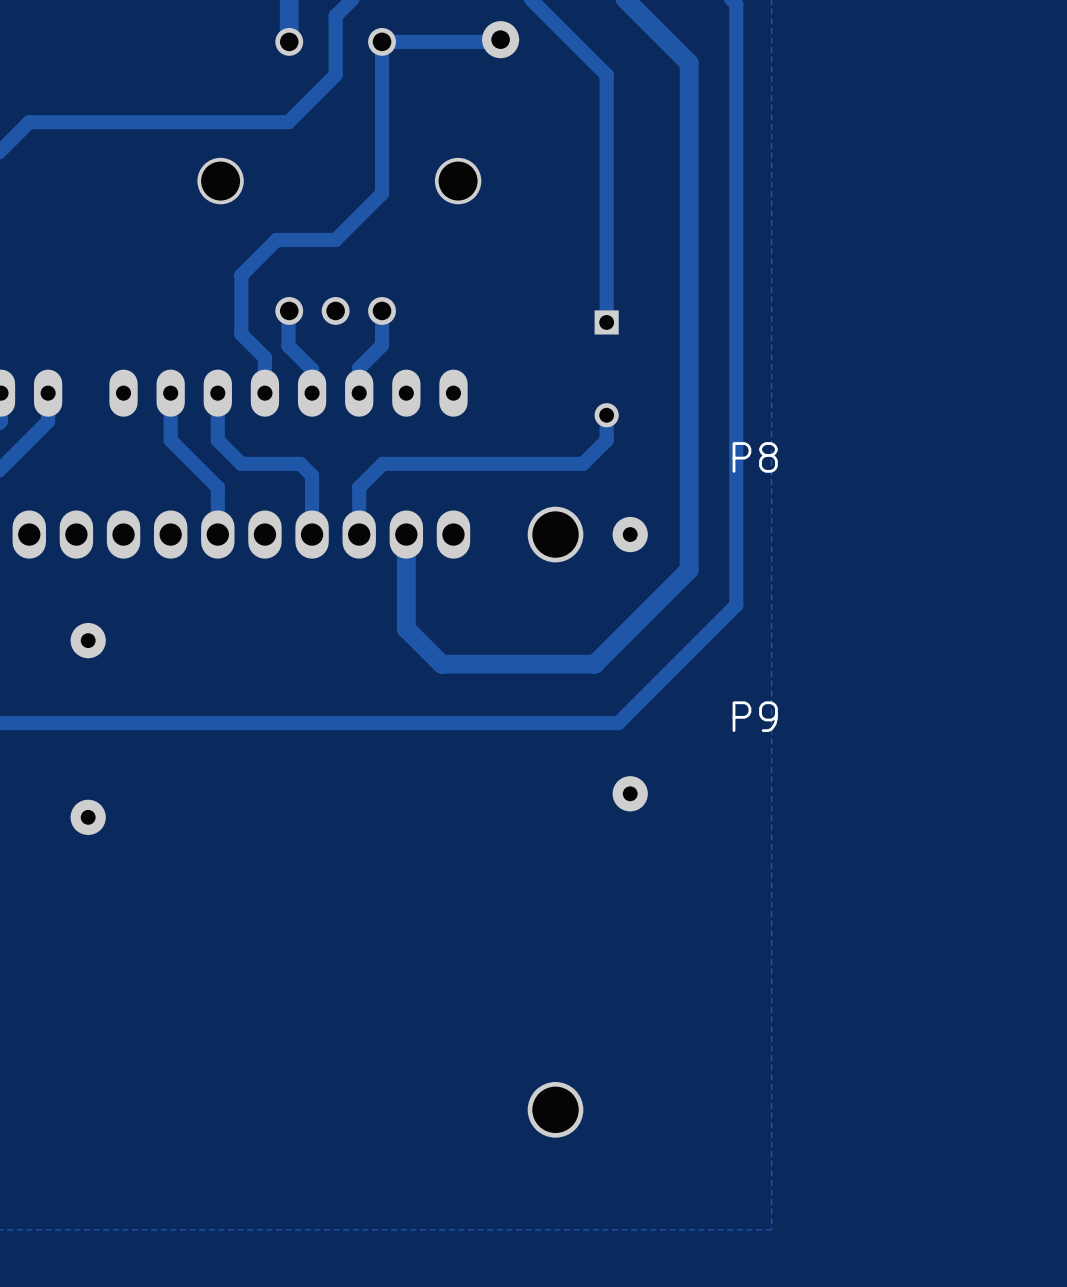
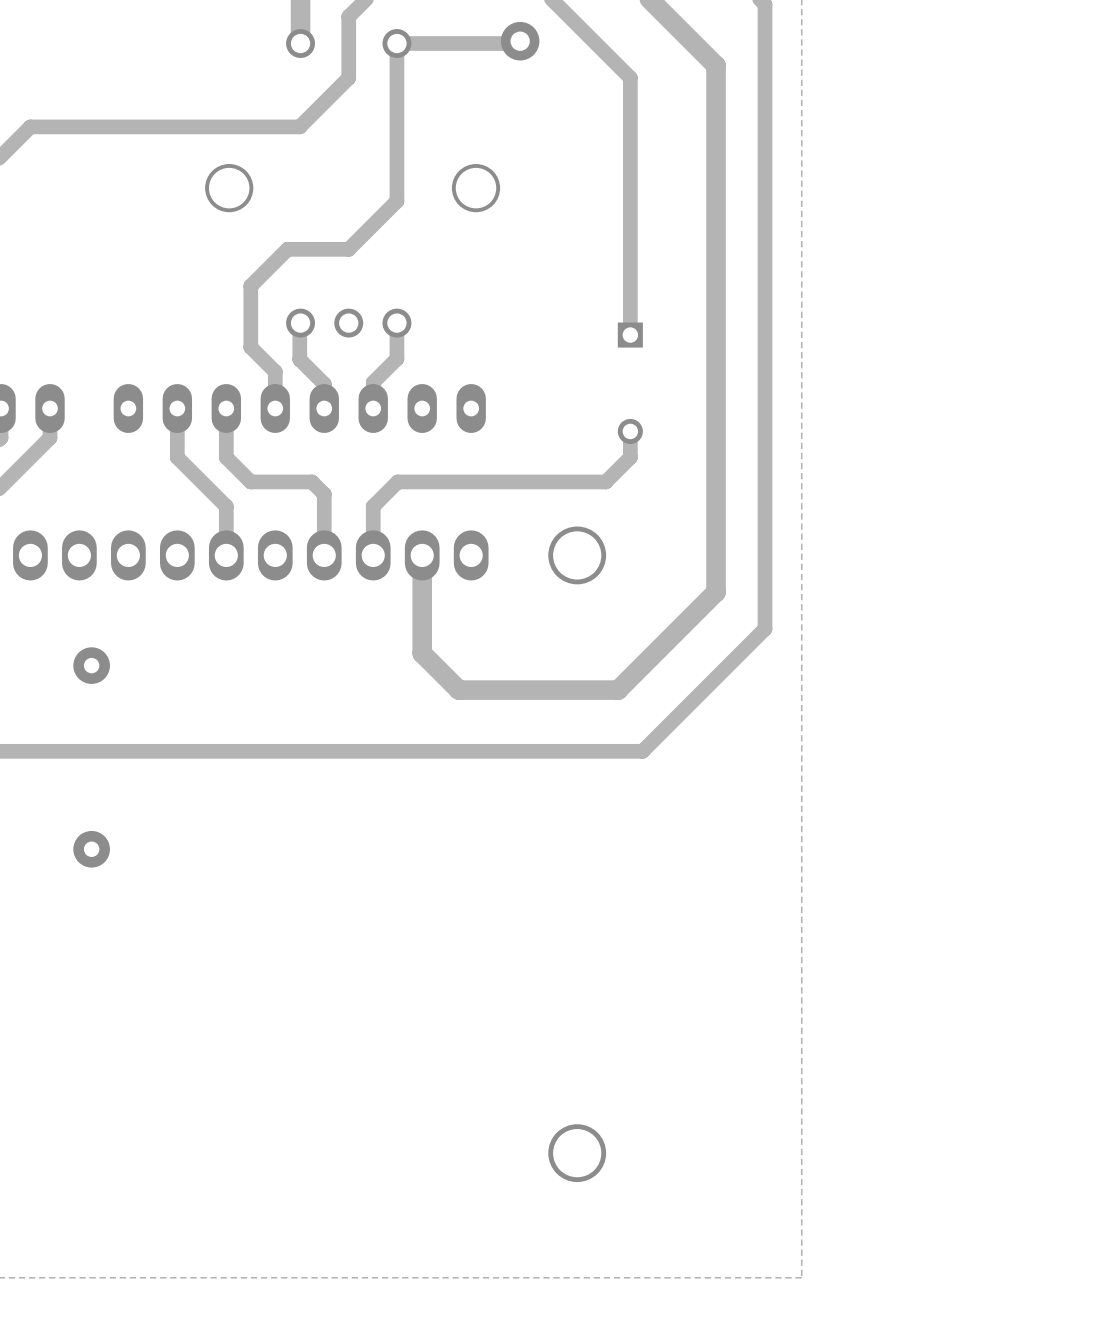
P8: (630, 534) -> none
P9: (630, 793) -> none

